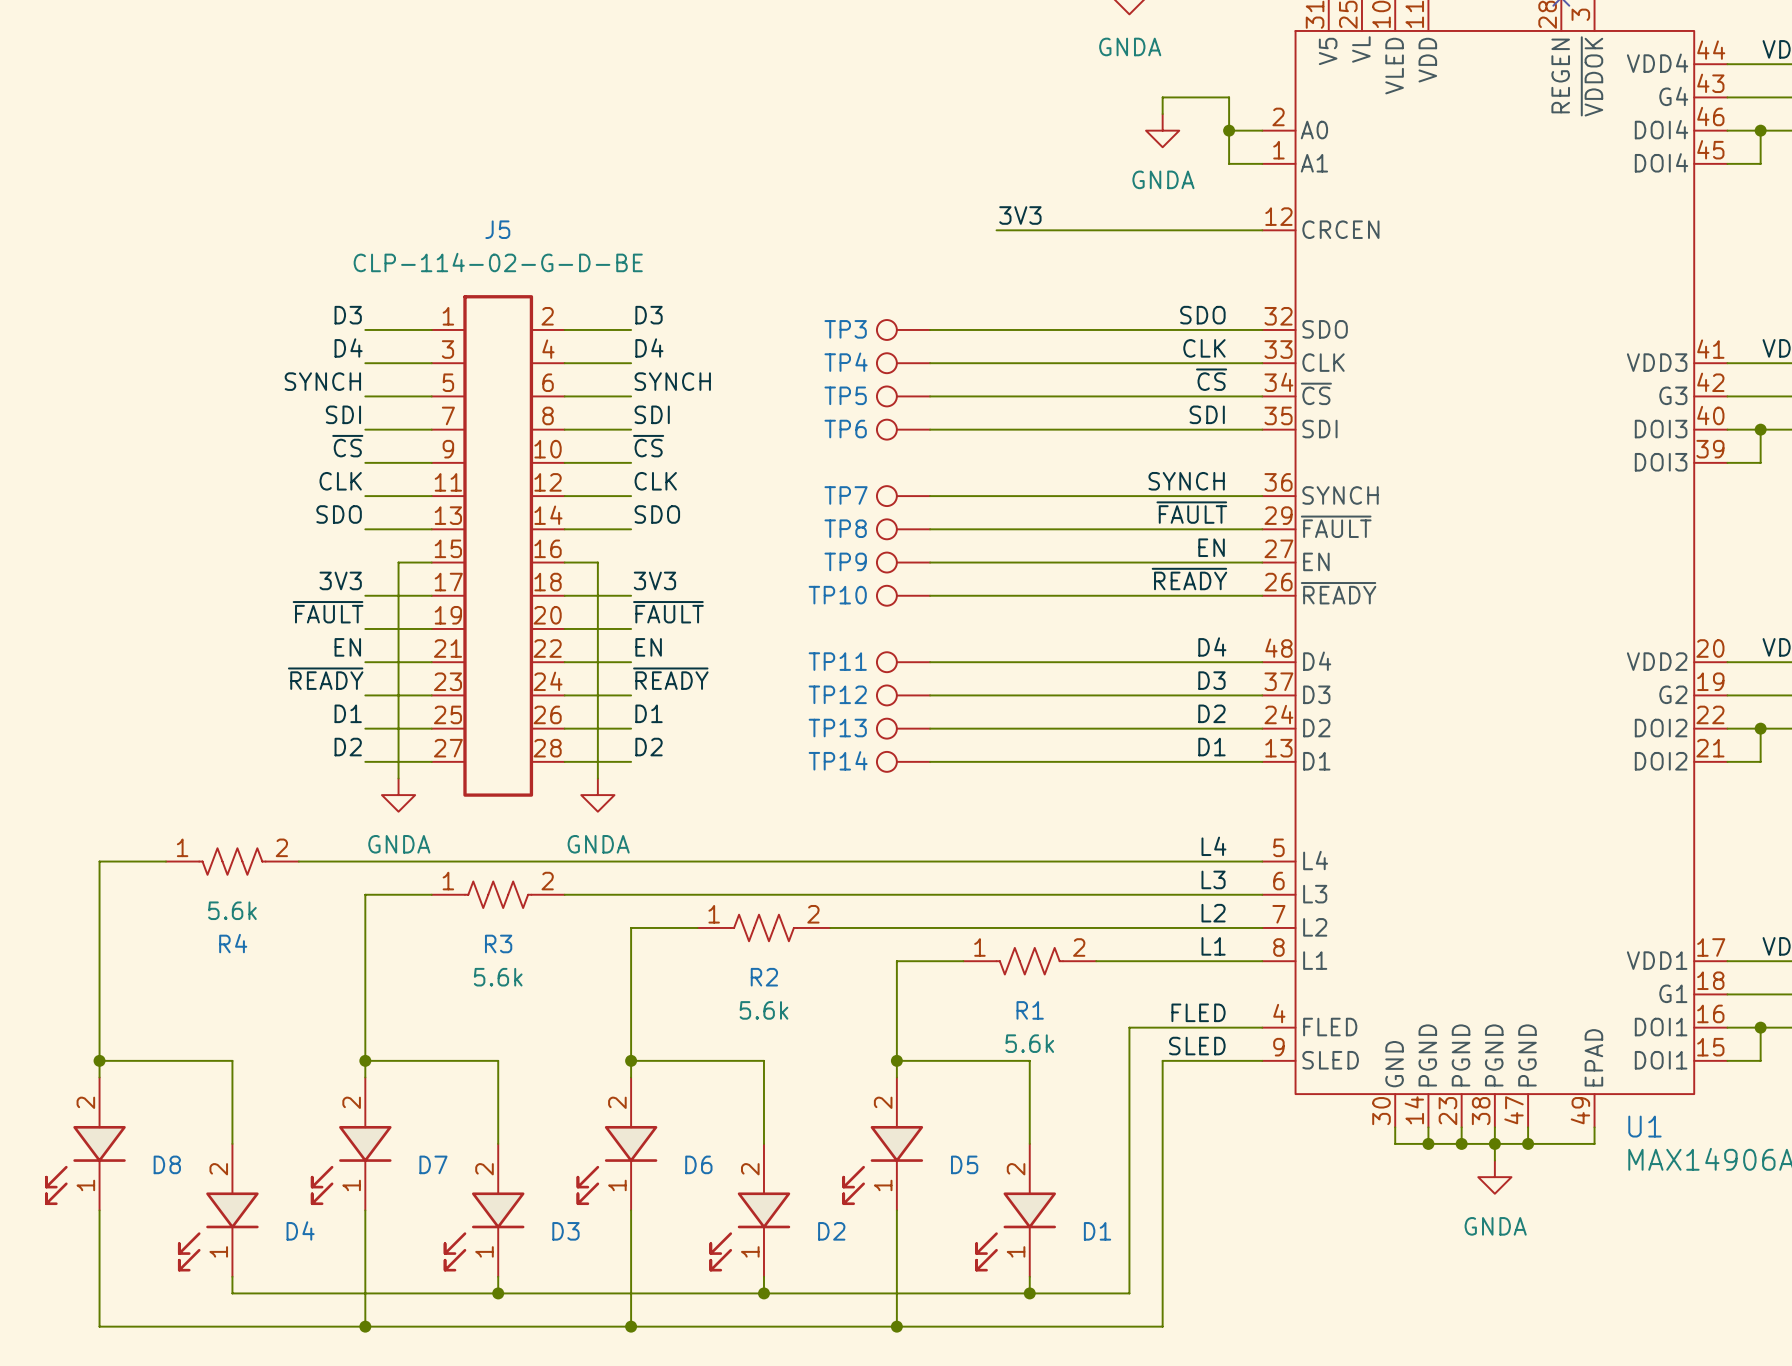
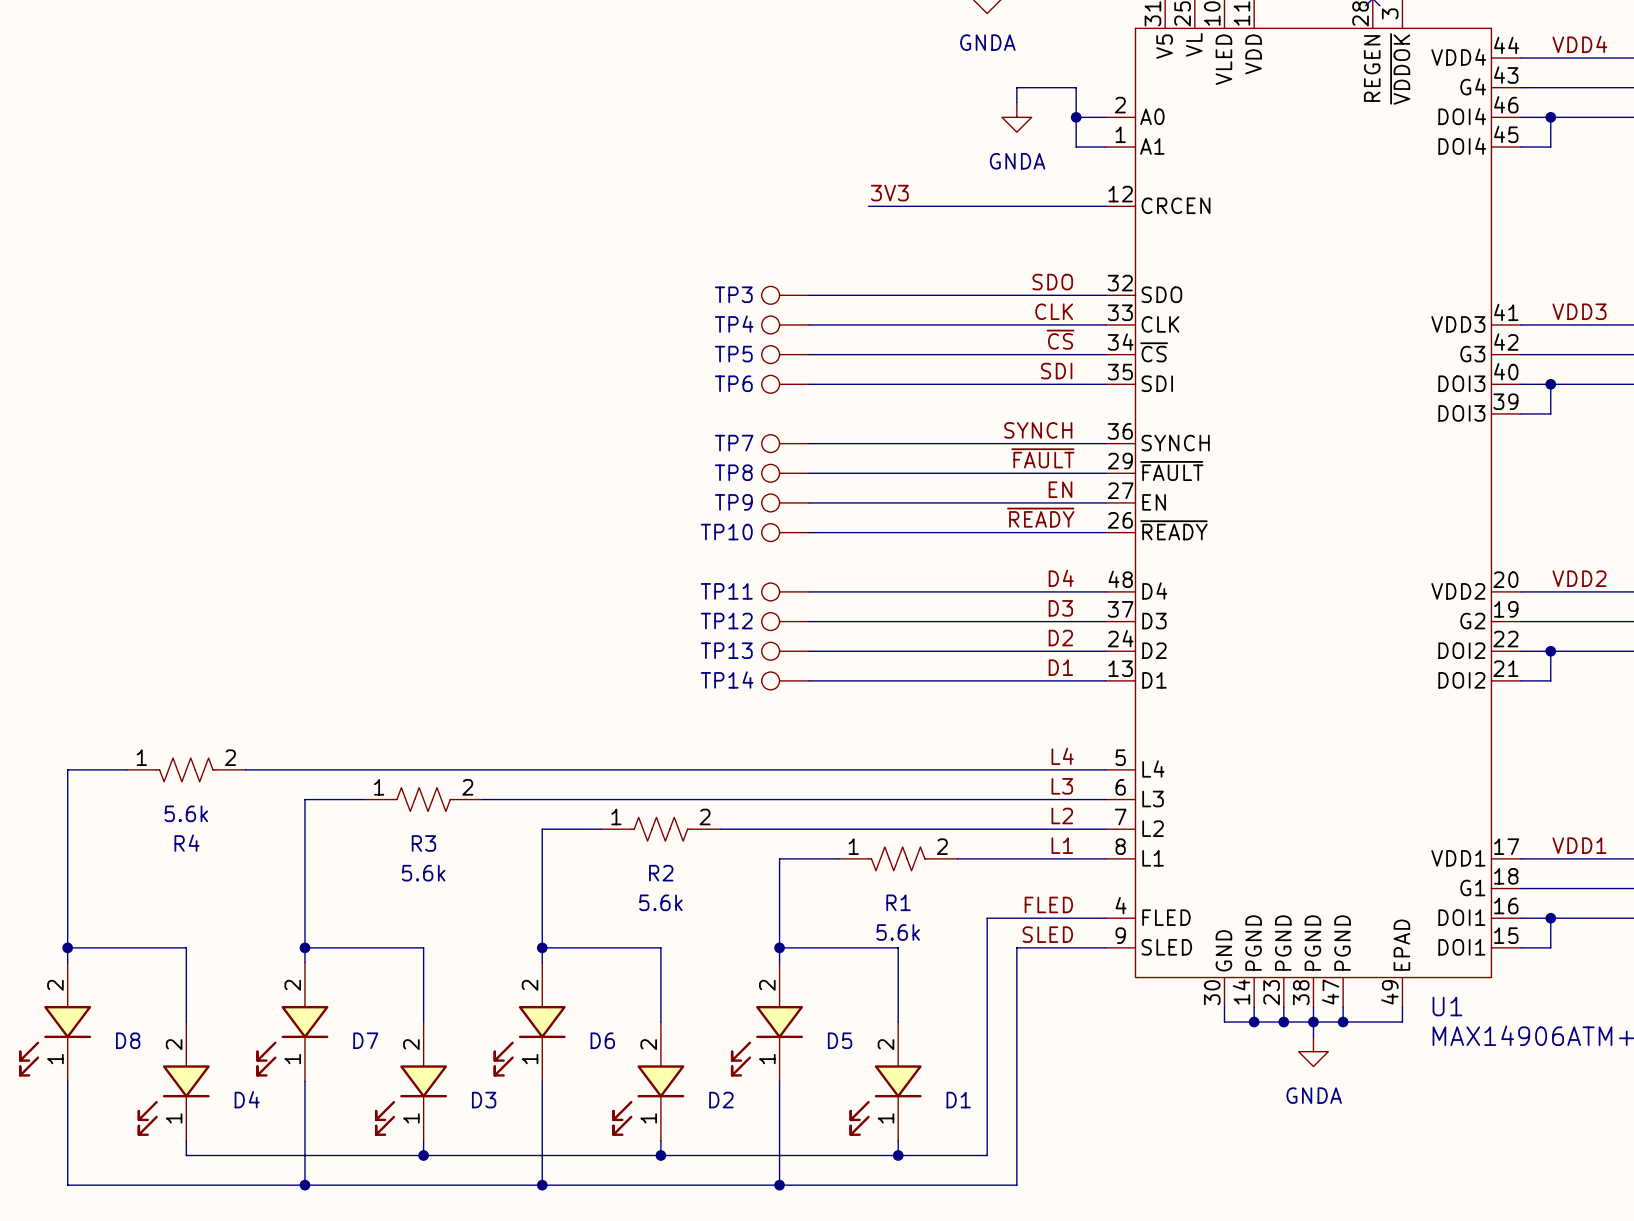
label: D3 (348, 315) -> none
label: D3 (649, 315) -> none
wire: (365, 329) (431, 329) -> none
wire: (564, 329) (631, 329) -> none
label: D4 (348, 347) -> none
label: D4 (649, 347) -> none
wire: (365, 363) (431, 363) -> none
wire: (564, 363) (631, 363) -> none
label: SYNCH (322, 381) -> none
label: SYNCH (672, 381) -> none
wire: (365, 396) (431, 396) -> none
wire: (564, 396) (631, 396) -> none
label: SDI (343, 414) -> none
label: SDI (652, 414) -> none
wire: (365, 429) (431, 429) -> none
wire: (564, 429) (631, 429) -> none
label: ~{CS} (347, 446) -> none
label: ~{CS} (648, 446) -> none
wire: (365, 462) (431, 462) -> none
wire: (564, 462) (631, 462) -> none
label: CLK (340, 481) -> none
label: CLK (655, 481) -> none
wire: (365, 496) (431, 496) -> none
wire: (564, 496) (631, 496) -> none
label: SDO (339, 514) -> none
label: SDO (657, 514) -> none
wire: (365, 529) (431, 529) -> none
wire: (564, 529) (631, 529) -> none
J5: CLP-114-02-G-D-BE (498, 545) -> none
wire: (431, 562) (398, 562) (398, 778) -> none
wire: (564, 562) (597, 562) (597, 778) -> none
label: 3V3 (340, 580) -> none
label: 3V3 (654, 580) -> none
wire: (365, 595) (431, 595) -> none
wire: (564, 595) (631, 595) -> none
label: ~{FAULT} (328, 612) -> none
label: ~{FAULT} (668, 612) -> none
wire: (365, 628) (431, 628) -> none
wire: (564, 628) (631, 628) -> none
label: EN (347, 647) -> none
label: EN (648, 647) -> none
wire: (365, 662) (431, 662) -> none
wire: (564, 662) (631, 662) -> none
label: ~{READY} (325, 678) -> none
label: ~{READY} (670, 678) -> none
wire: (365, 695) (431, 695) -> none
wire: (564, 695) (631, 695) -> none
label: D1 (348, 713) -> none
label: D1 (649, 713) -> none
wire: (365, 728) (431, 728) -> none
wire: (564, 728) (631, 728) -> none
label: D2 (348, 747) -> none
label: D2 (649, 747) -> none
wire: (365, 761) (431, 761) -> none
wire: (564, 761) (631, 761) -> none
power symbol: GNDA (398, 795) -> none
power symbol: GNDA (597, 795) -> none

